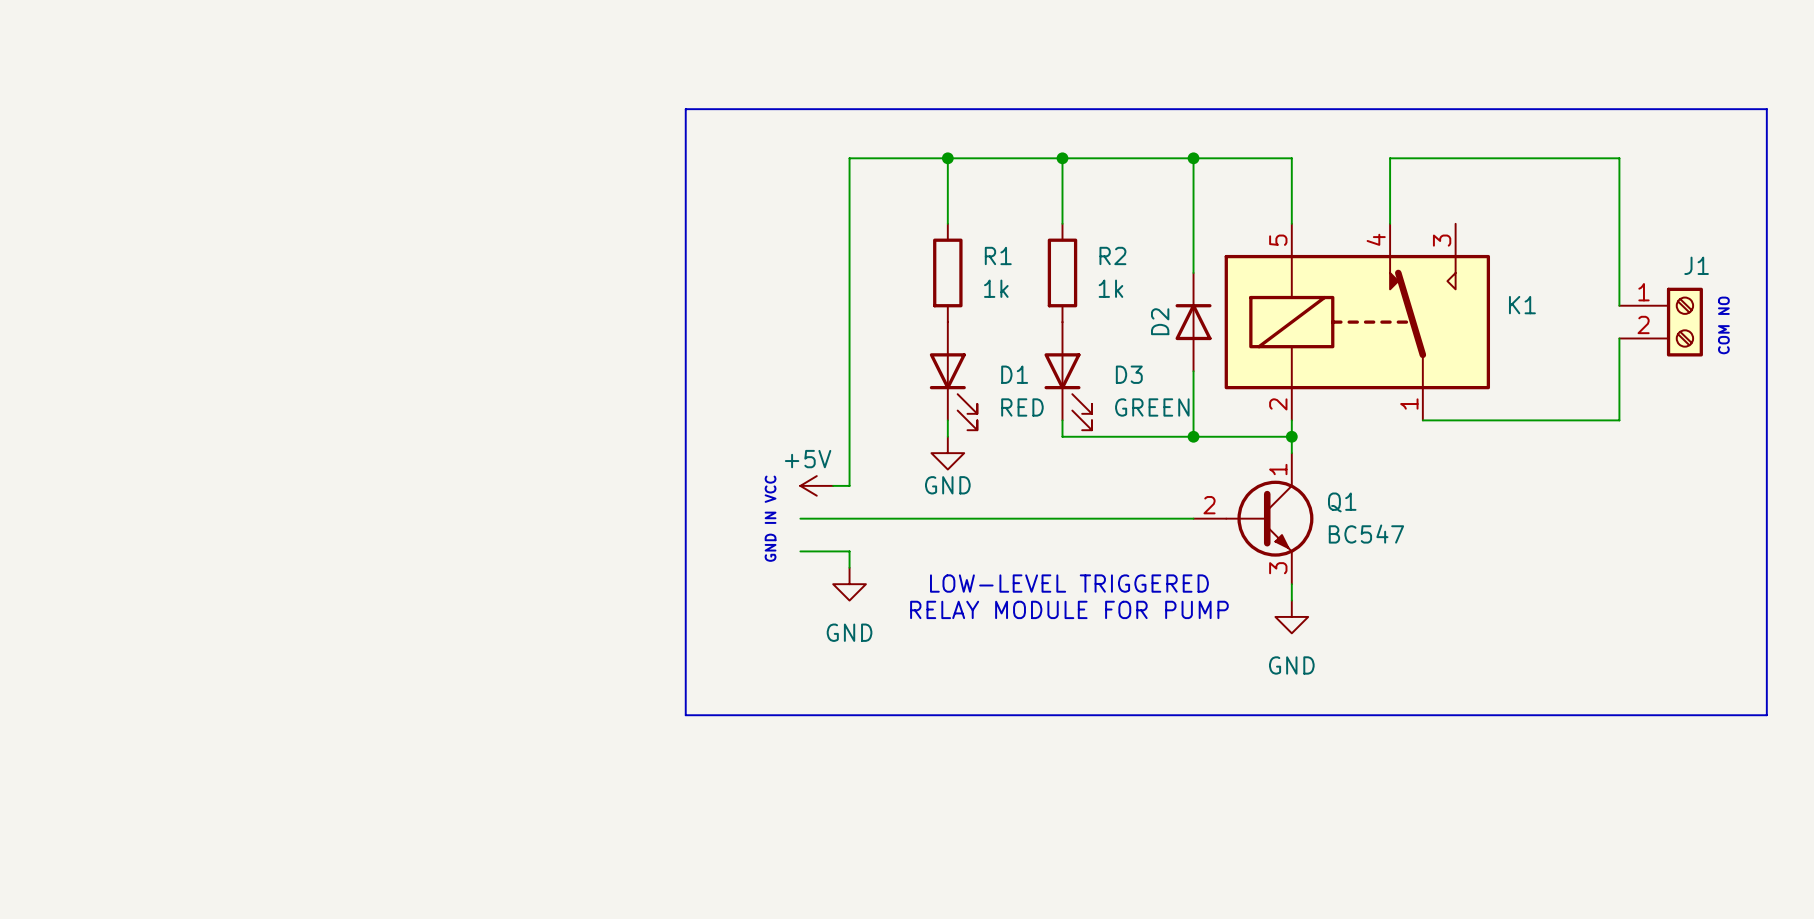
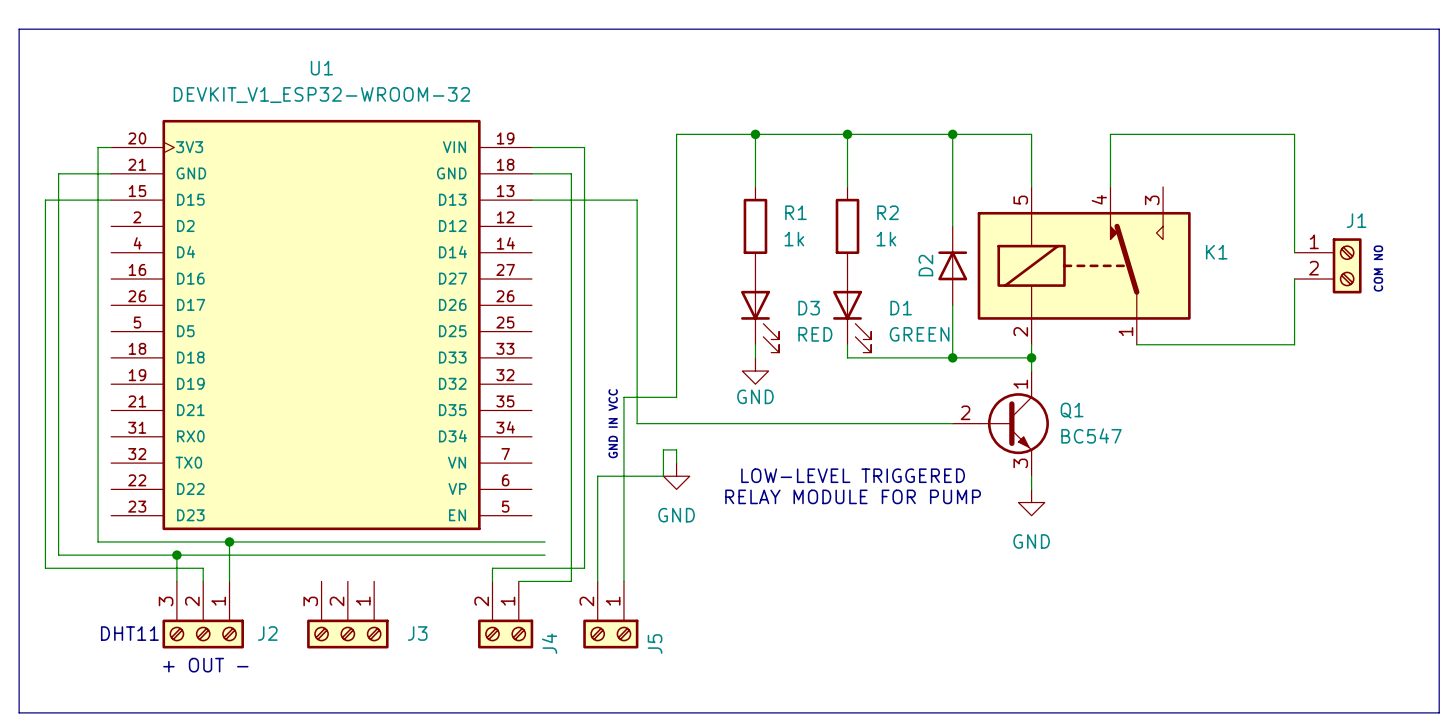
line: none -> (19, 29) (1439, 29) (1439, 712) (19, 712) (19, 29)
line: (685, 109) (1766, 109) (1766, 715) (685, 715) (685, 109) -> none
wire: none -> (111, 147) (98, 147) (98, 541) (545, 541)
wire: none -> (531, 147) (584, 147) (584, 568) (492, 568) (492, 581)
wire: none -> (111, 173) (58, 173) (58, 555) (545, 555)
wire: none -> (531, 173) (571, 173) (571, 581) (518, 581)
wire: none -> (111, 200) (45, 200) (45, 568) (203, 568) (203, 581)
wire: none -> (531, 200) (637, 200) (637, 423)
D1 name: D1 (1014, 374) -> D3 (809, 308)
D3 name: D3 (1129, 374) -> D1 (901, 308)
U1: none -> DEVKIT_V1_ESP32-WROOM-32 (321, 325)
power symbol: +5V (816, 485) -> none
wire: none -> (663, 397) (623, 397) (623, 581)
wire: (800, 551) (833, 551) -> (597, 581) (597, 476) (663, 476) (663, 449)
wire: none -> (229, 541) (229, 581)
junction: none -> (229, 541)
wire: none -> (176, 555) (176, 581)
junction: none -> (176, 555)
J2: none -> (203, 614)
J3: none -> (347, 614)
J4: none -> (505, 614)
J5: none -> (610, 614)
text: none -> DHT11 (129, 633)
text: none -> + OUT - (205, 665)

